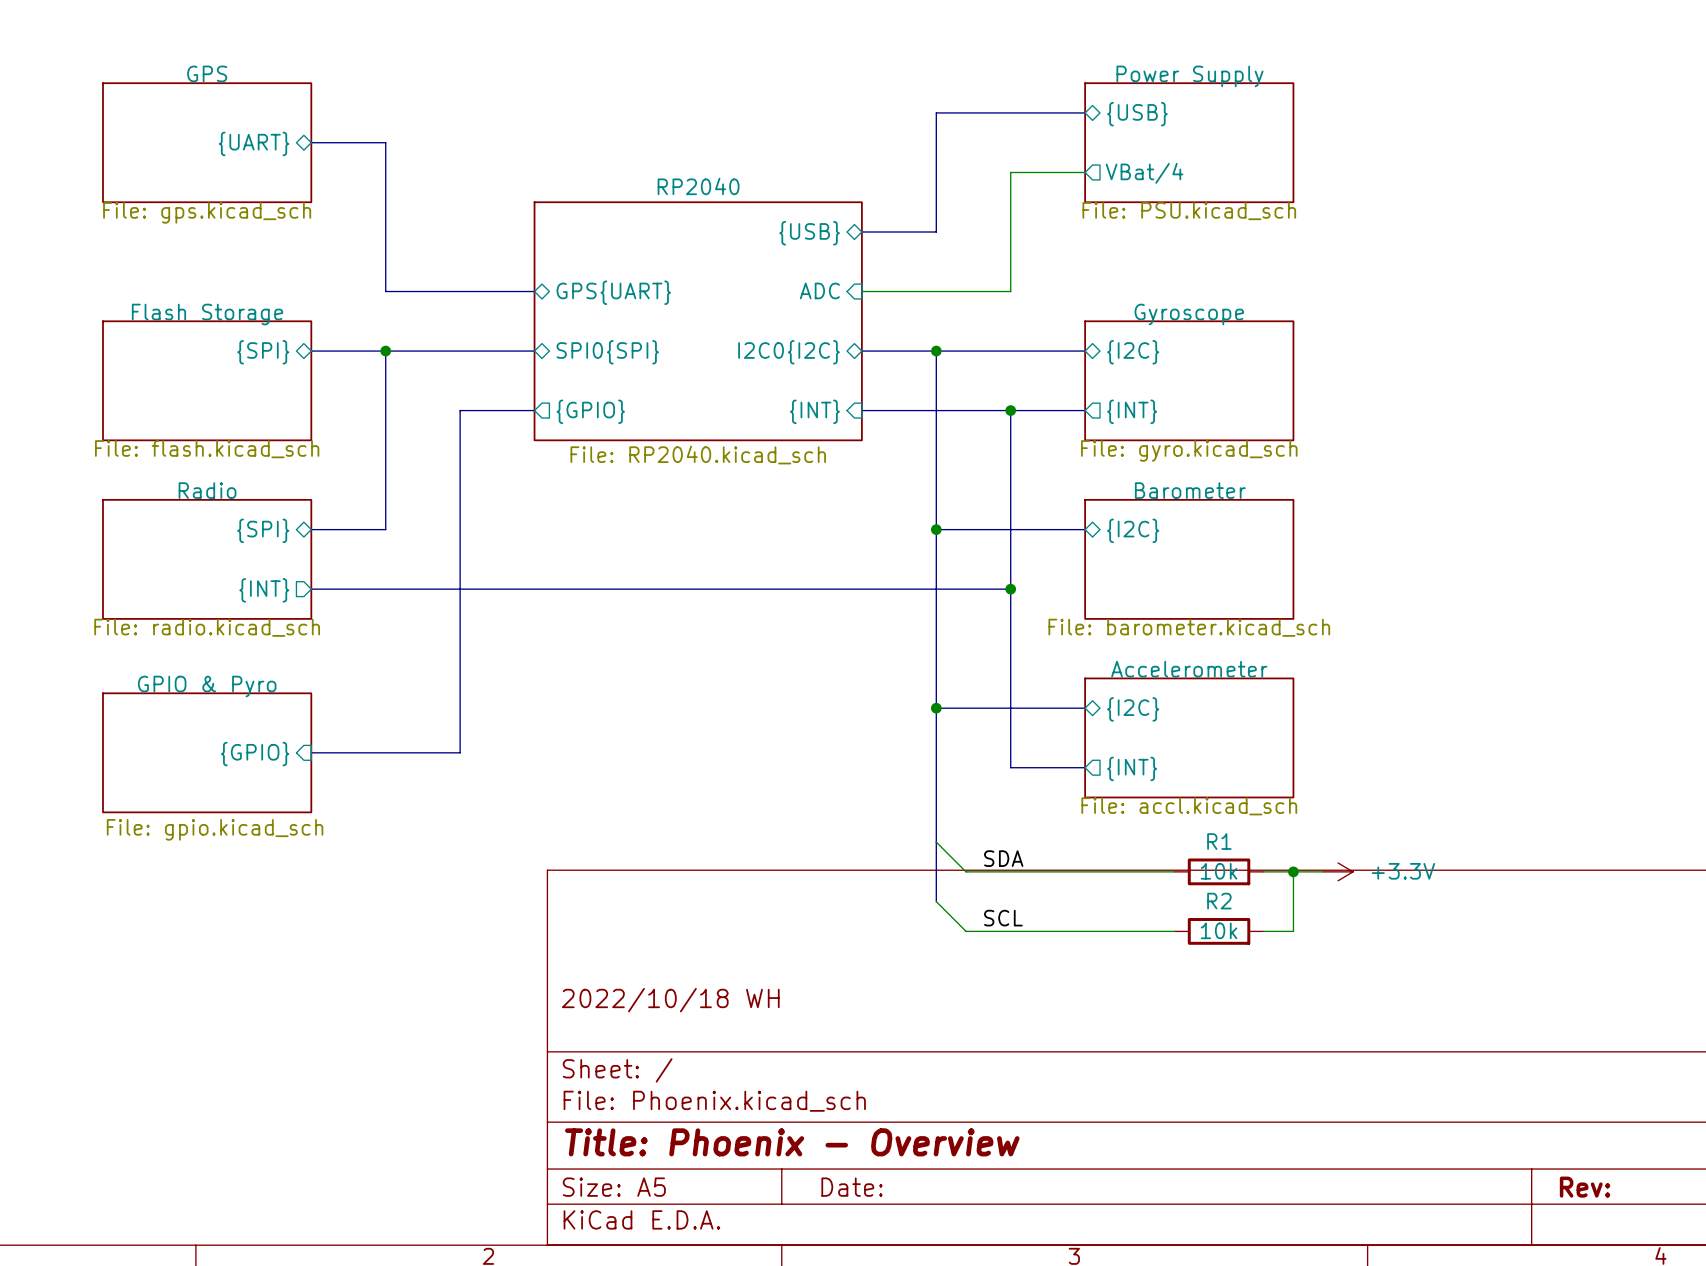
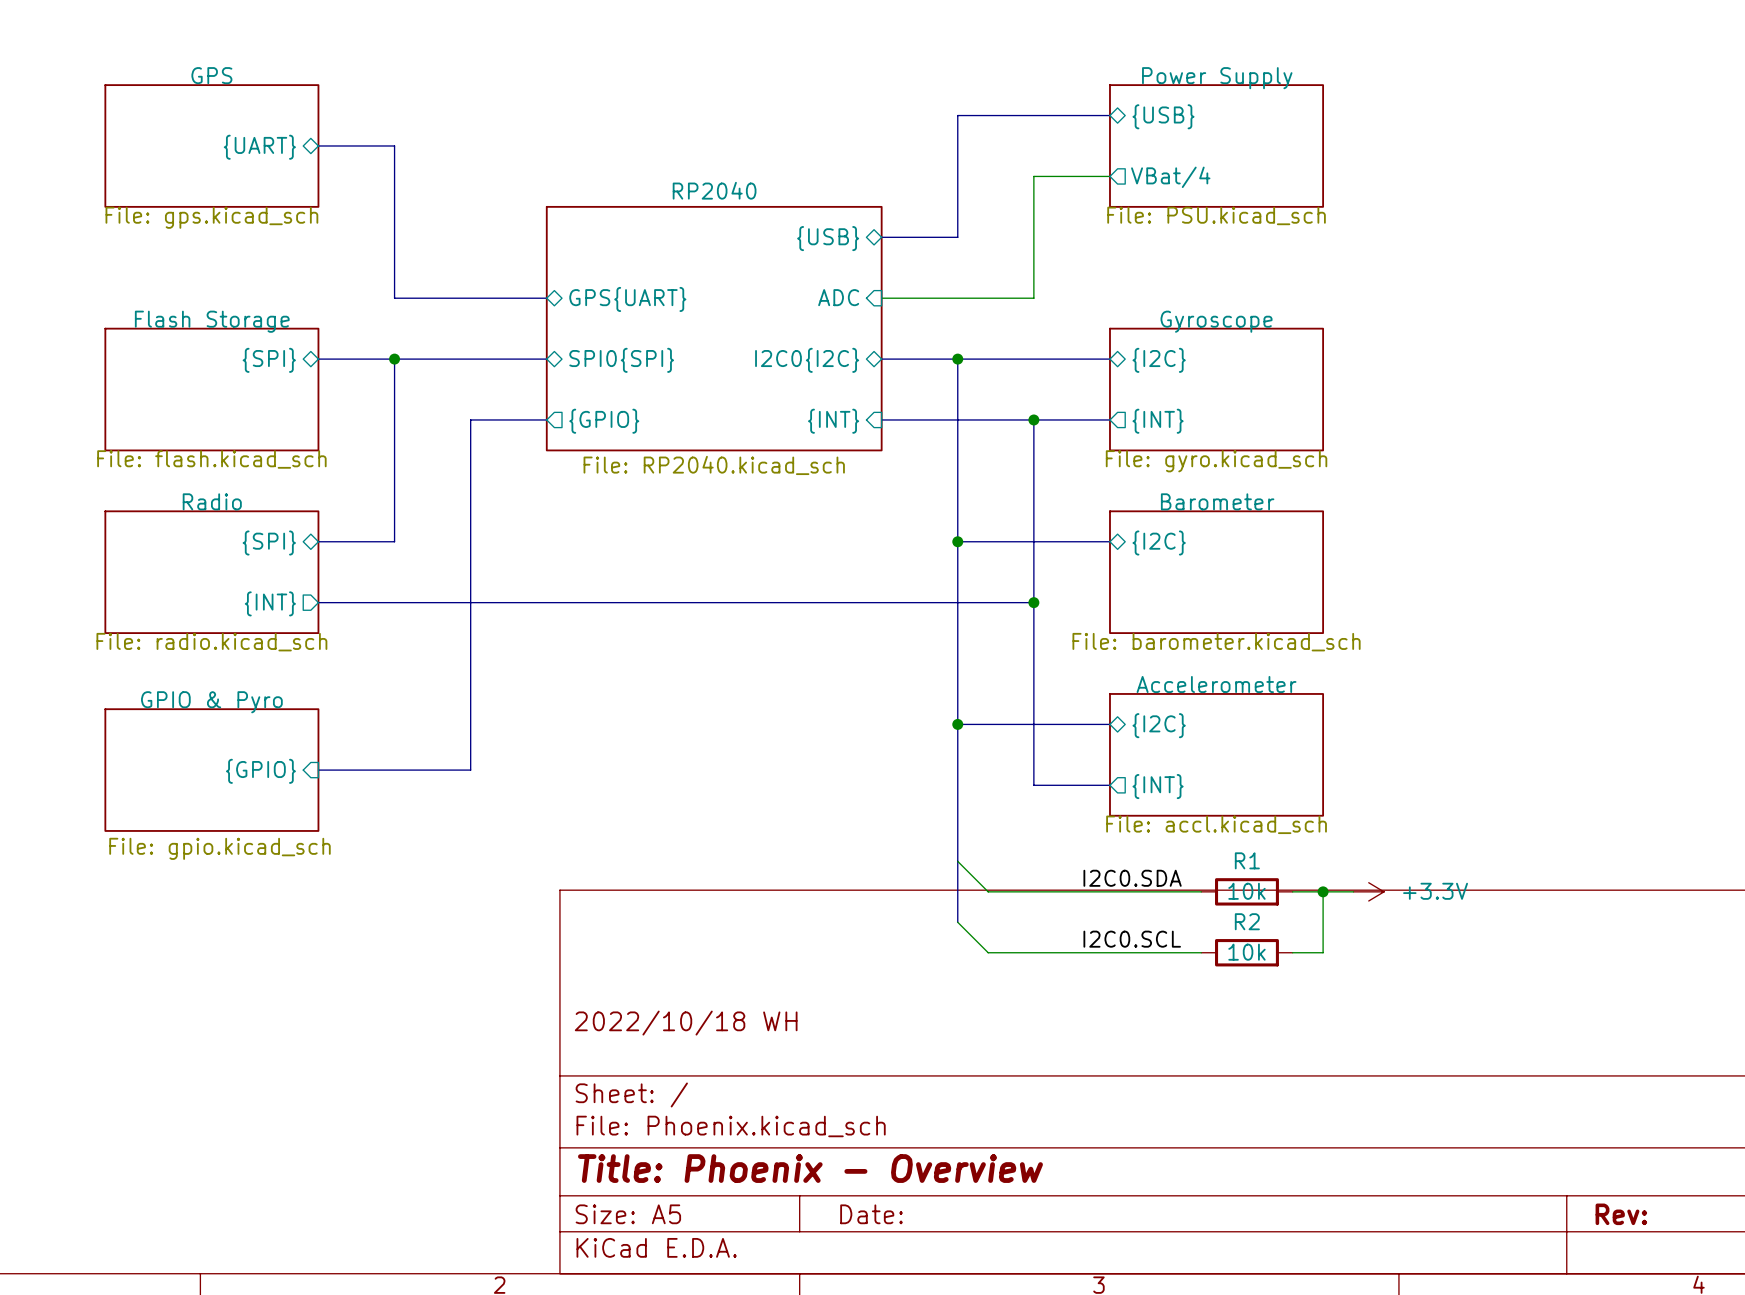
label: SDA (1003, 858) -> none
label: none -> I2C0.SDA (1132, 878)
label: SCL (1003, 918) -> none
label: none -> I2C0.SCL (1132, 939)

